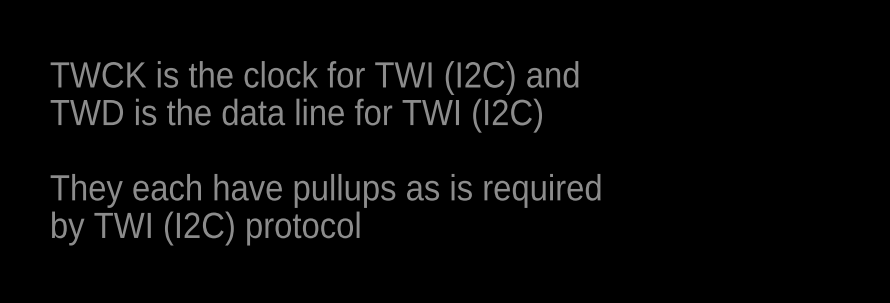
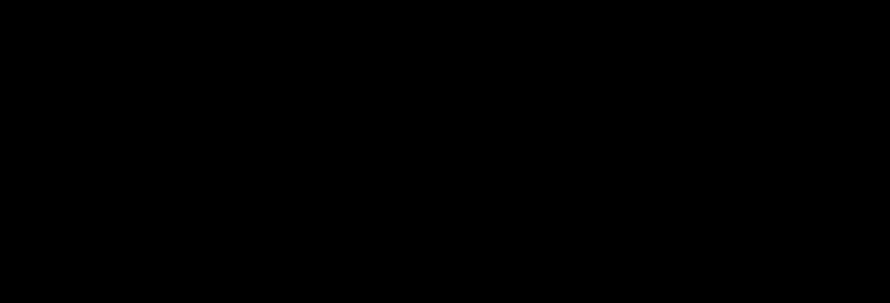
text: TWCK is the clock for TWI (I2C) and (314, 78) -> none
text: TWD is the data line for TWI (I2C) (296, 115) -> none
text: They each have pullups as is required (325, 190) -> none
text: by TWI (I2C) protocol (205, 228) -> none

